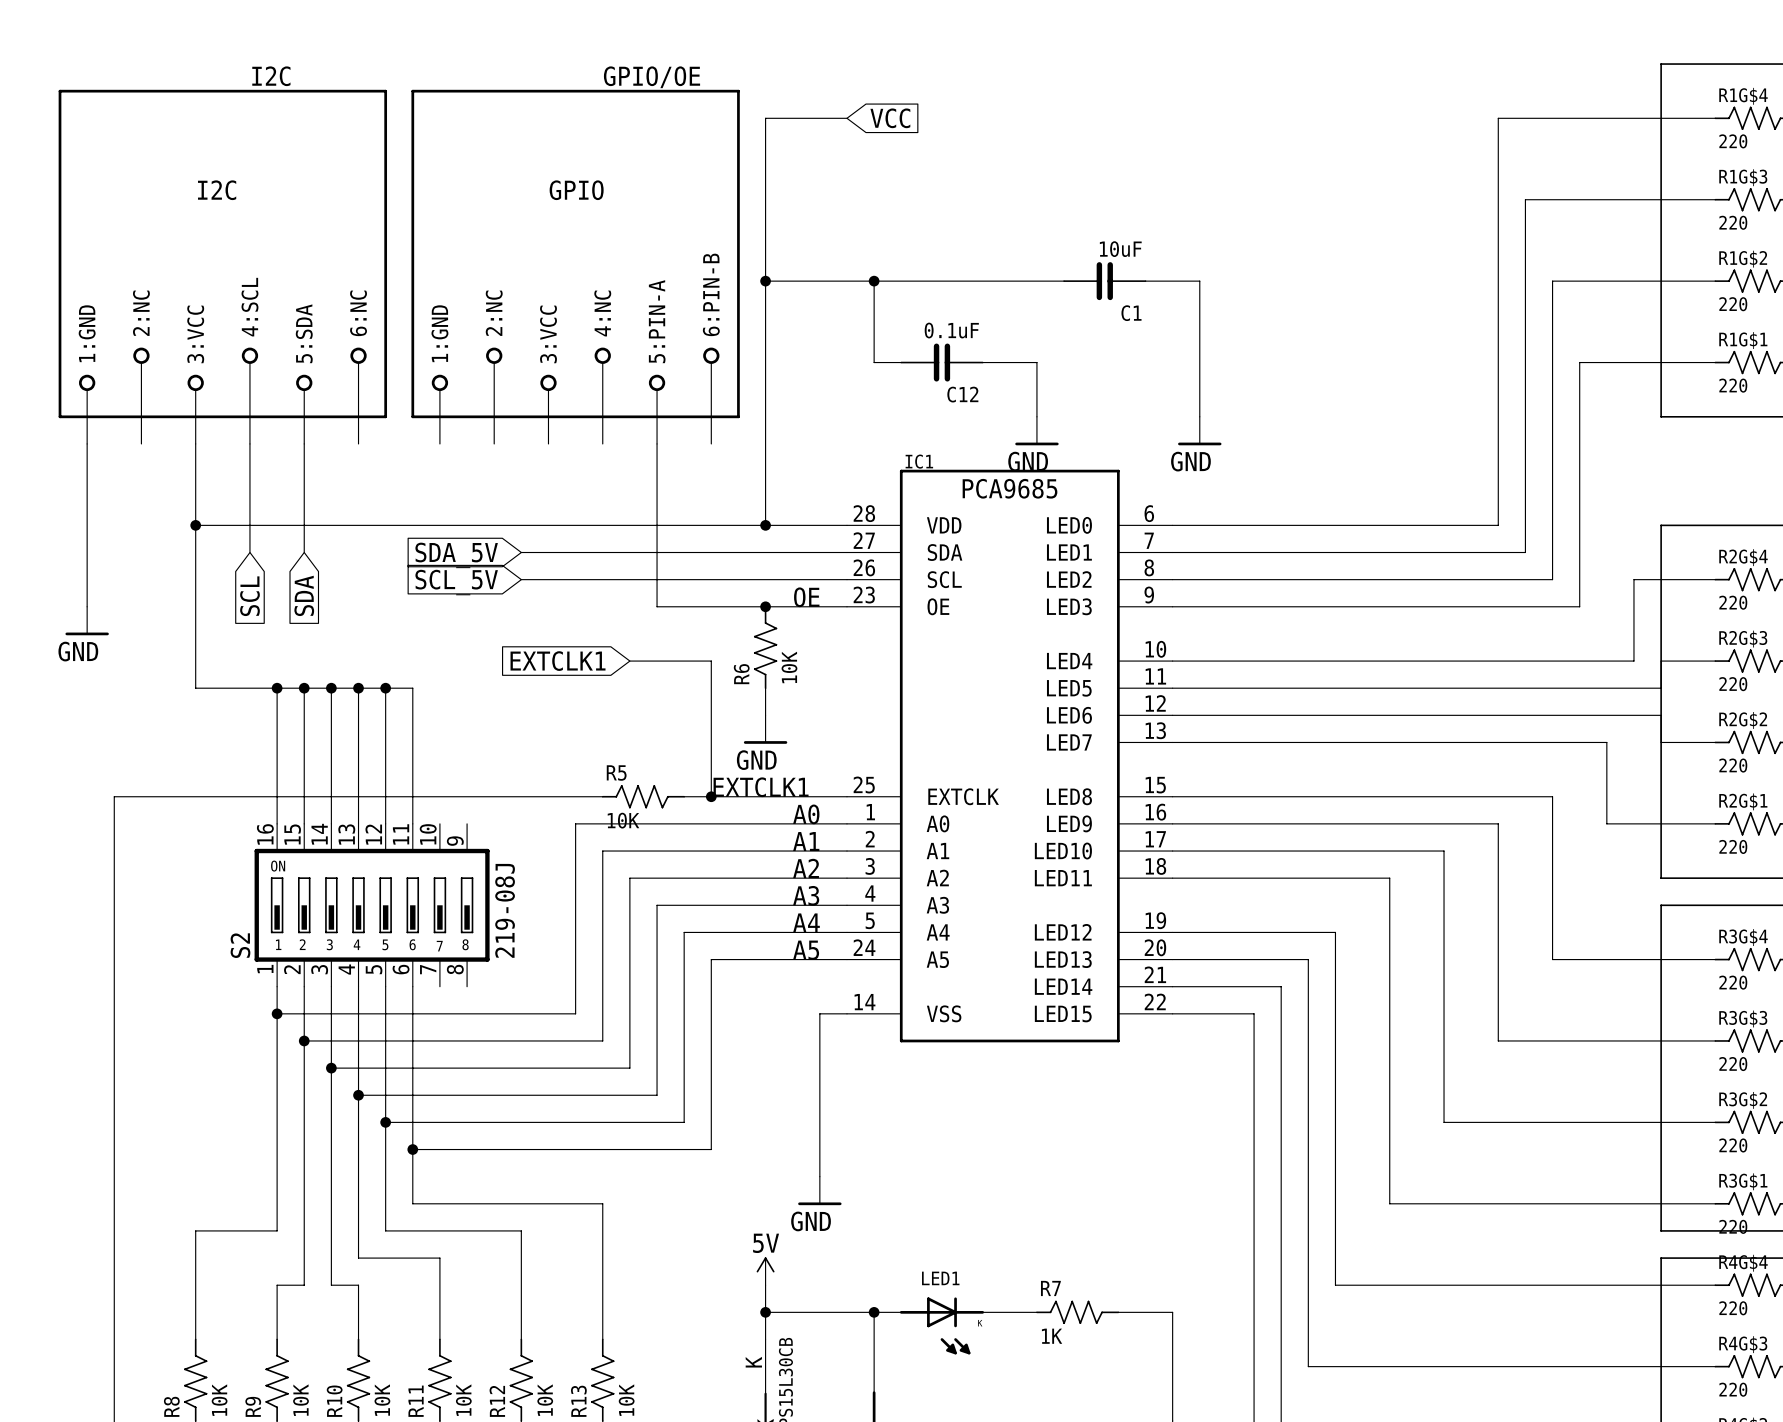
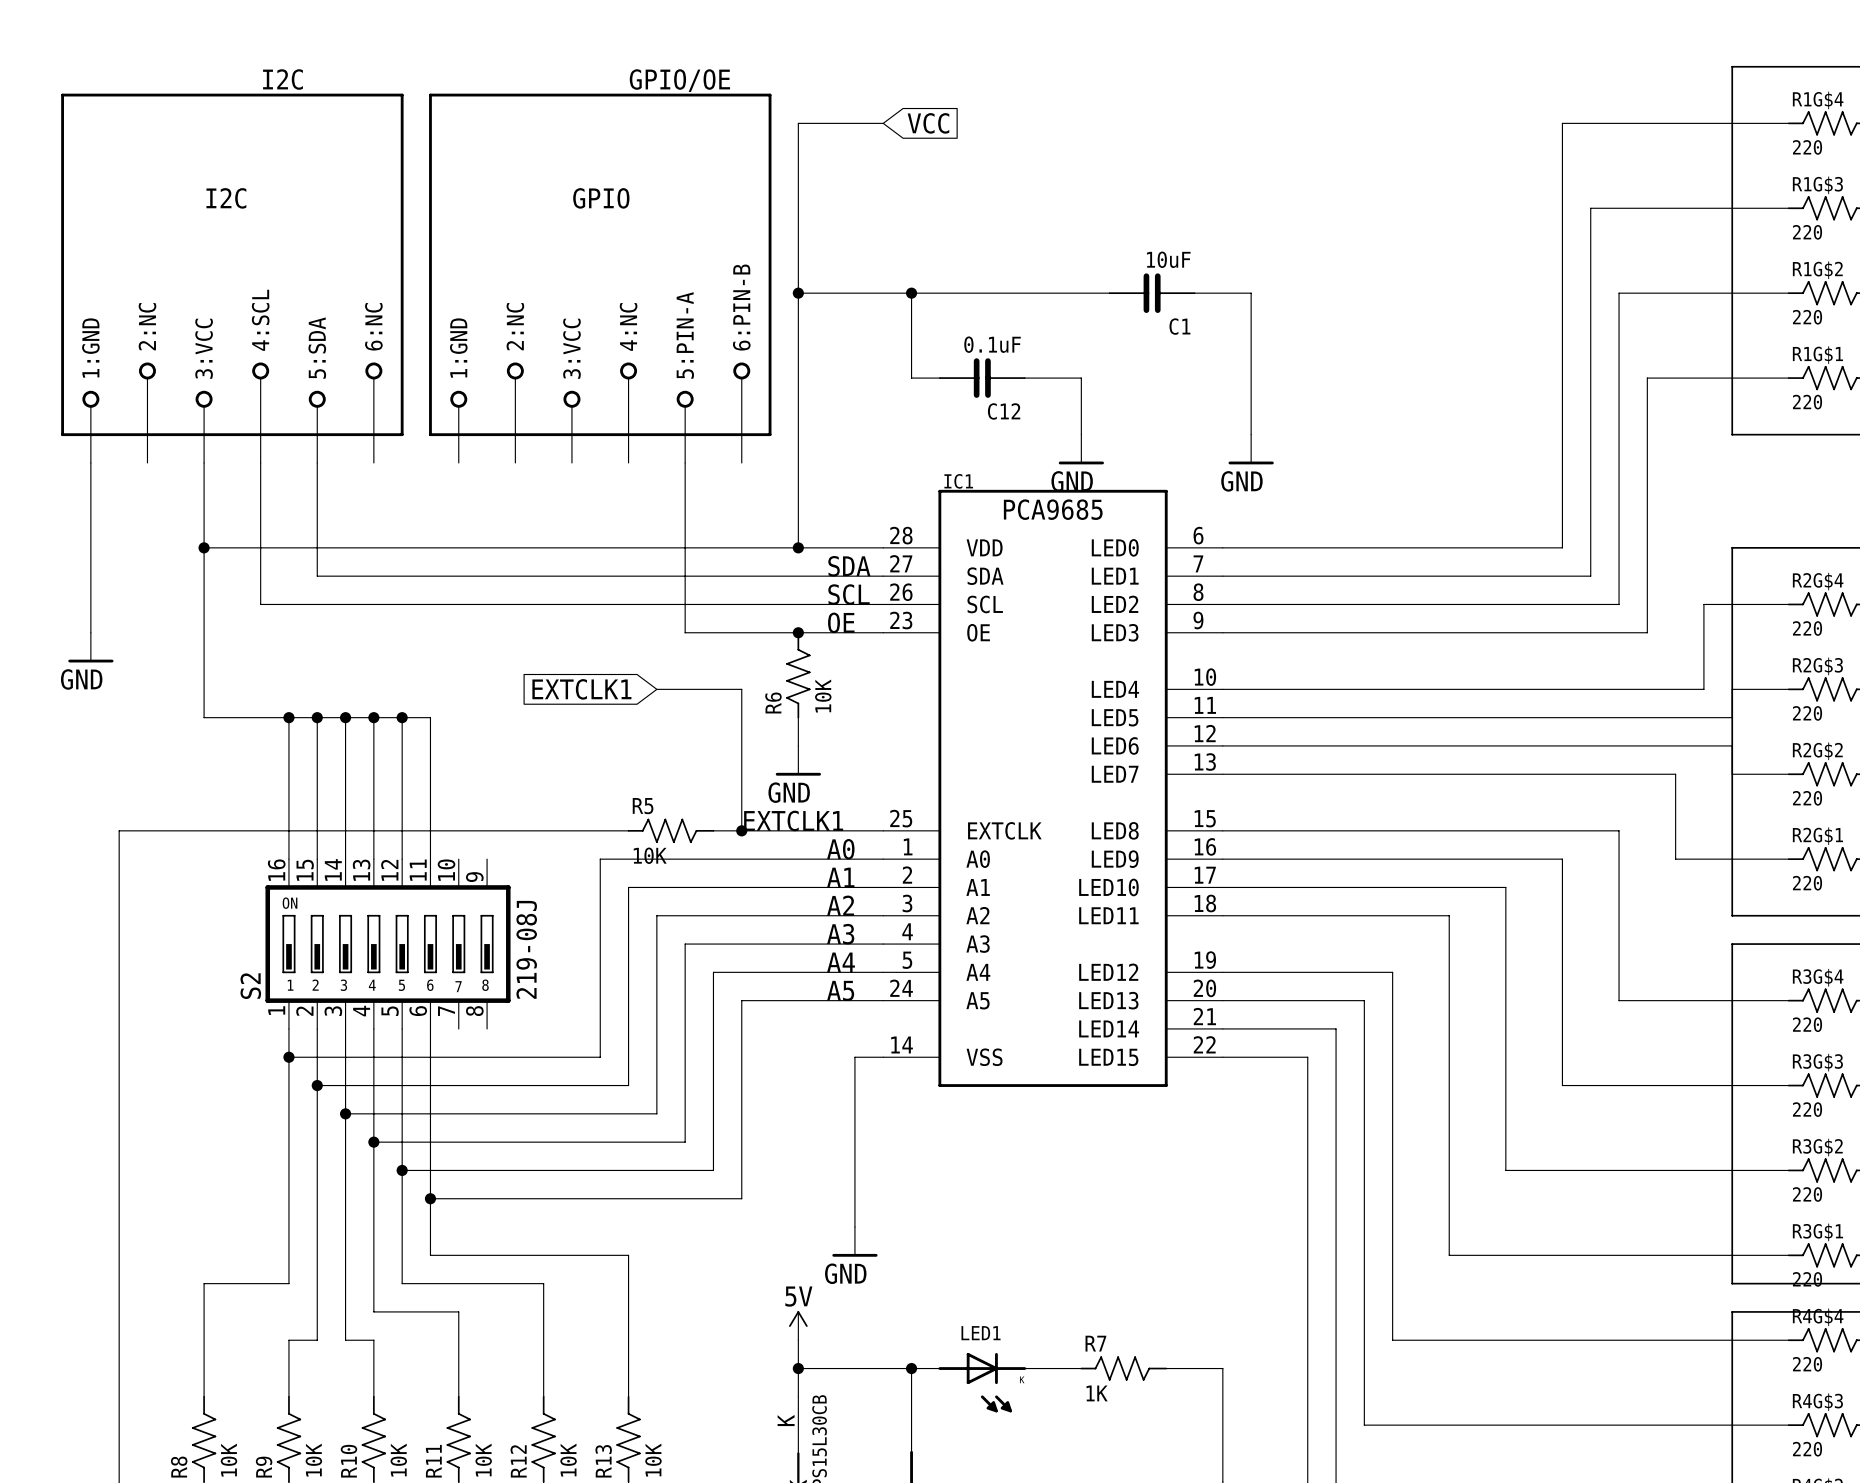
label: none -> SDA (849, 566)
wire: none -> (260, 576) (260, 604) (543, 604)
wire: none -> (317, 576) (543, 576)
global label: SDA_5V (456, 555) -> none
label: none -> SCL (849, 594)
global label: SCL_5V (456, 582) -> none
global label: SDA (304, 595) -> none
global label: SCL (249, 596) -> none

